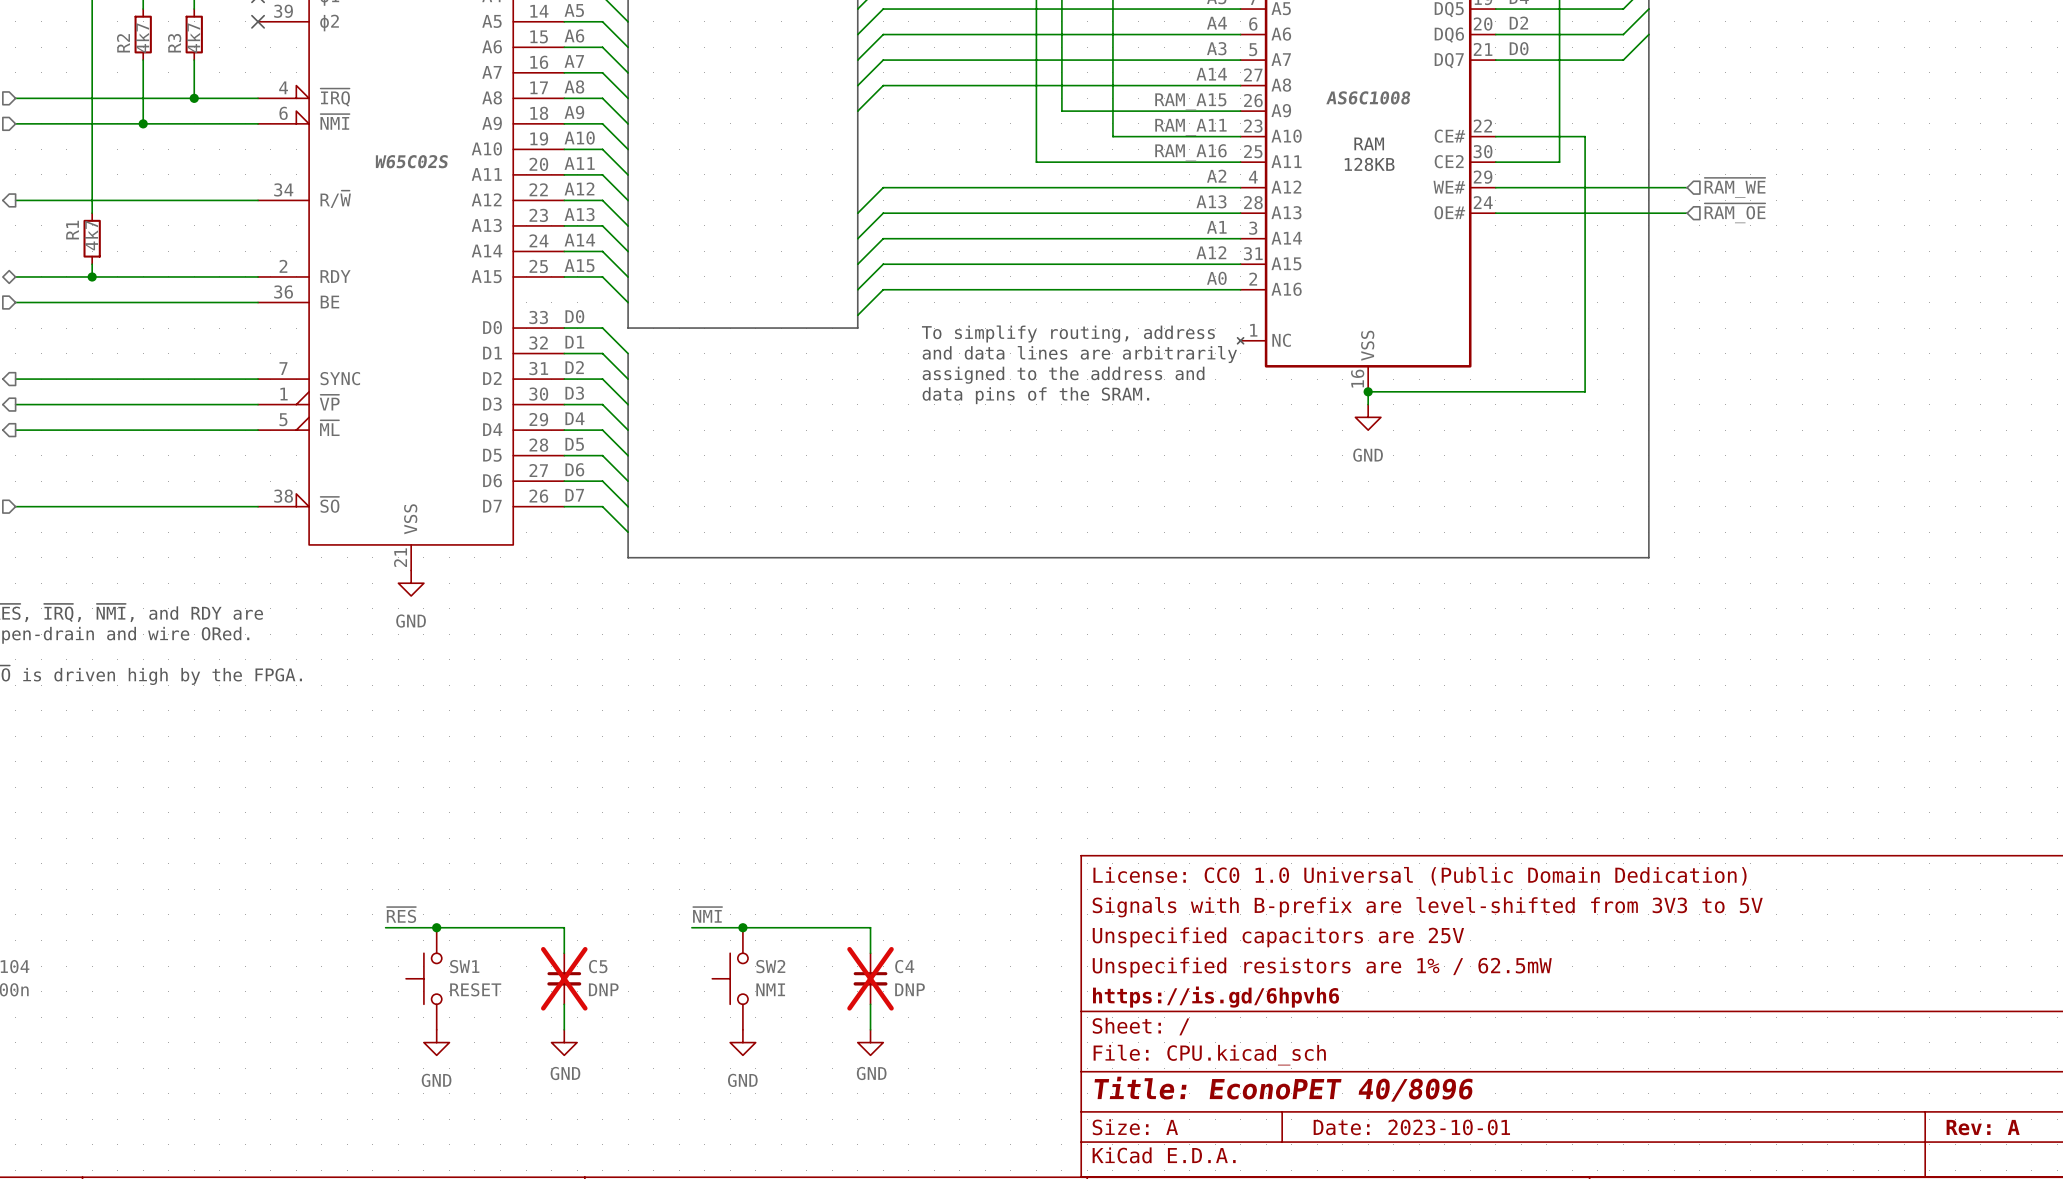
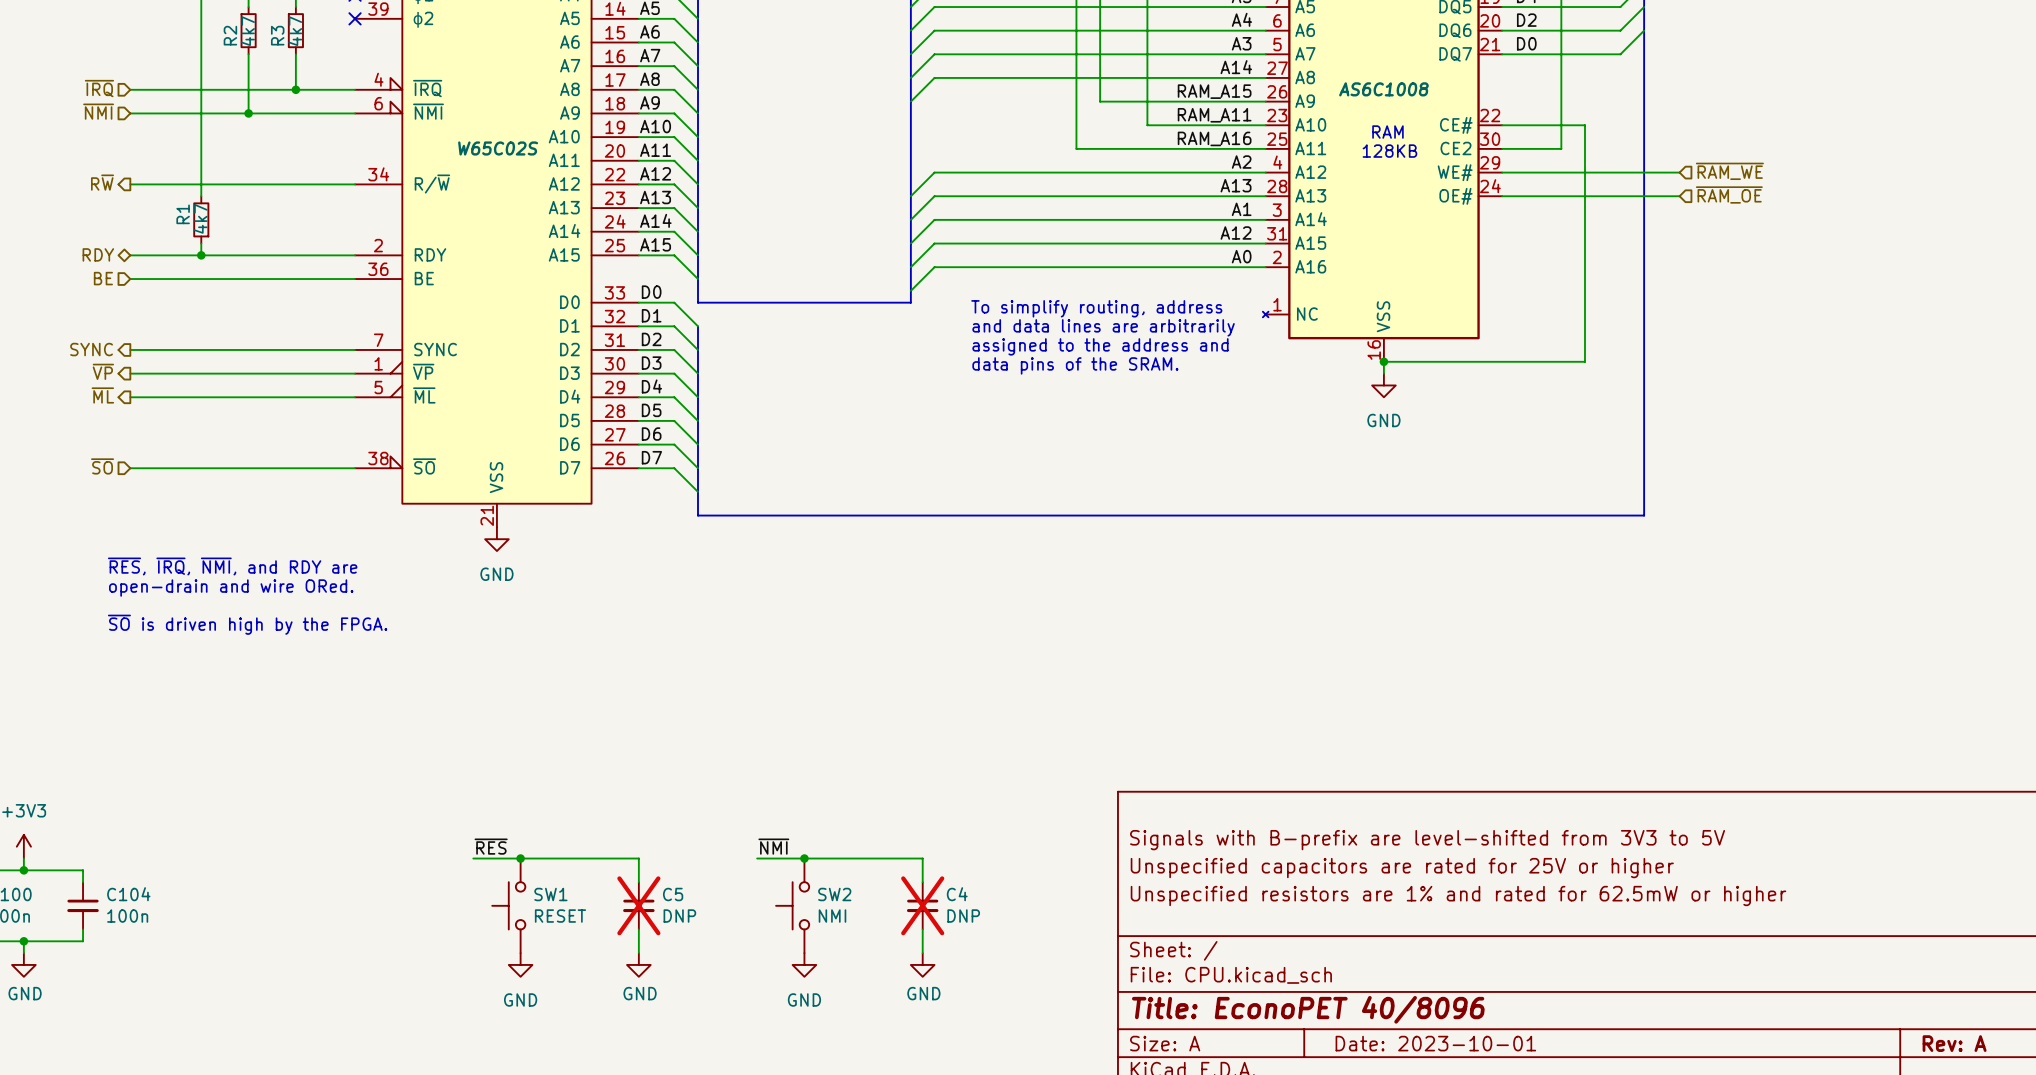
title block: License: CC0 1.0 Universal (Public Domain Dedication) (1419, 876) -> none
title block: Unspecified capacitors are 25V (1278, 937) -> Unspecified capacitors are rated for 25V or higher (1402, 868)
title block: Unspecified resistors are 1% / 62.5mW (1322, 967) -> Unspecified resistors are 1% and rated for 62.5mW or higher (1458, 895)
title block: https://is.gd/6hpvh6 (1216, 997) -> none

